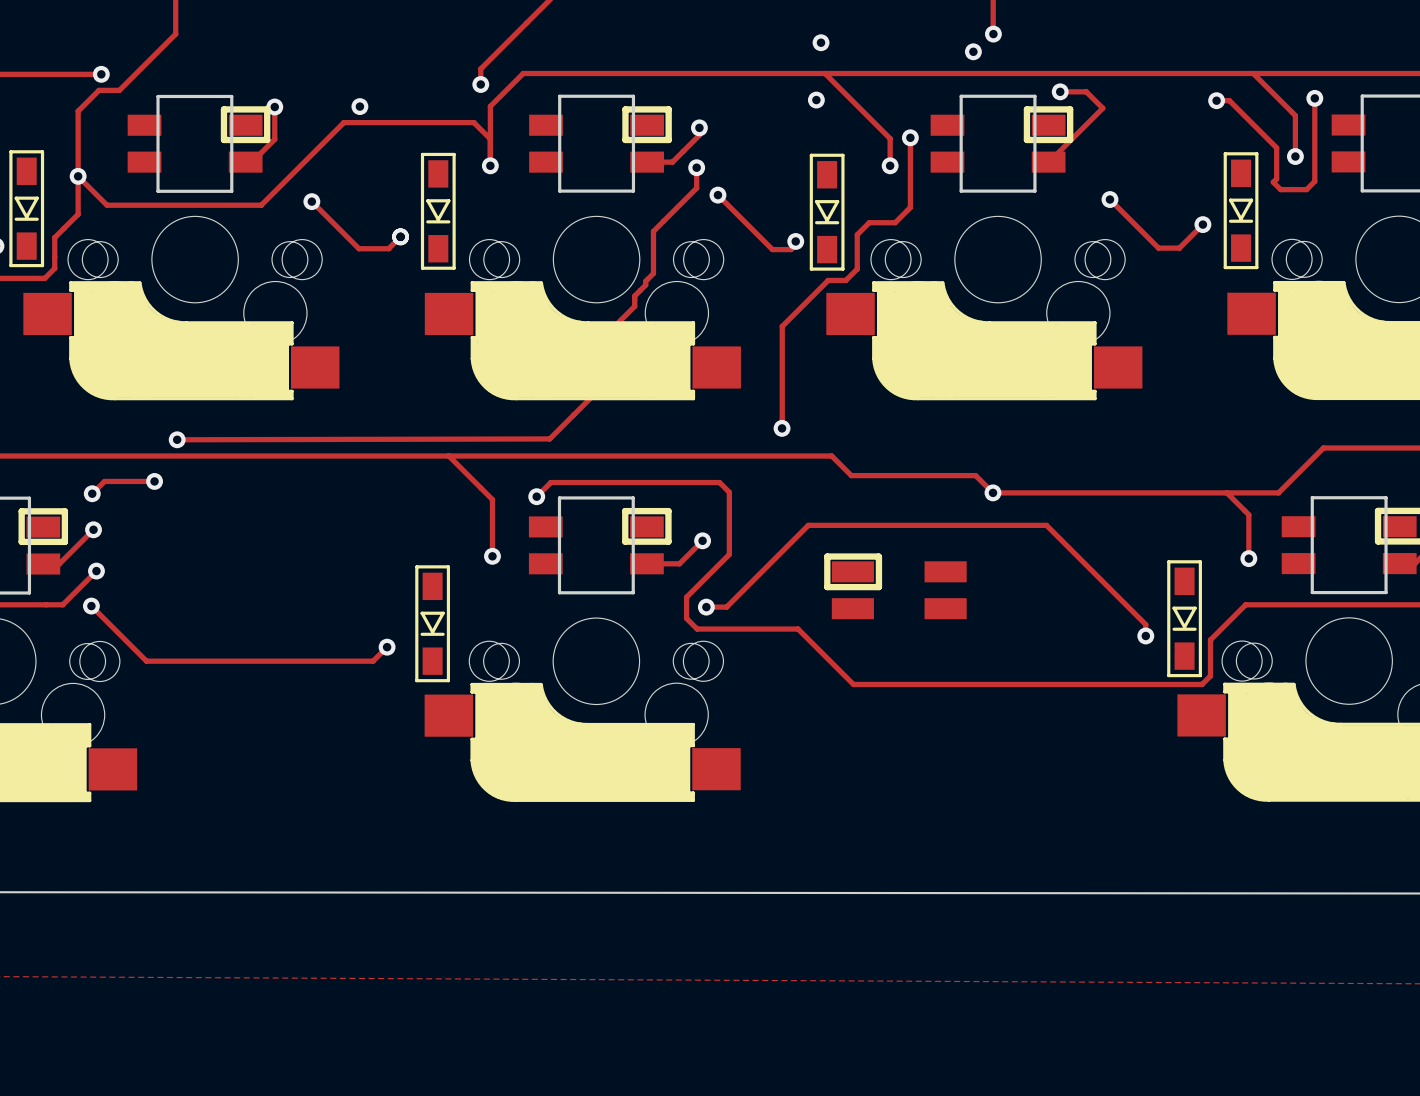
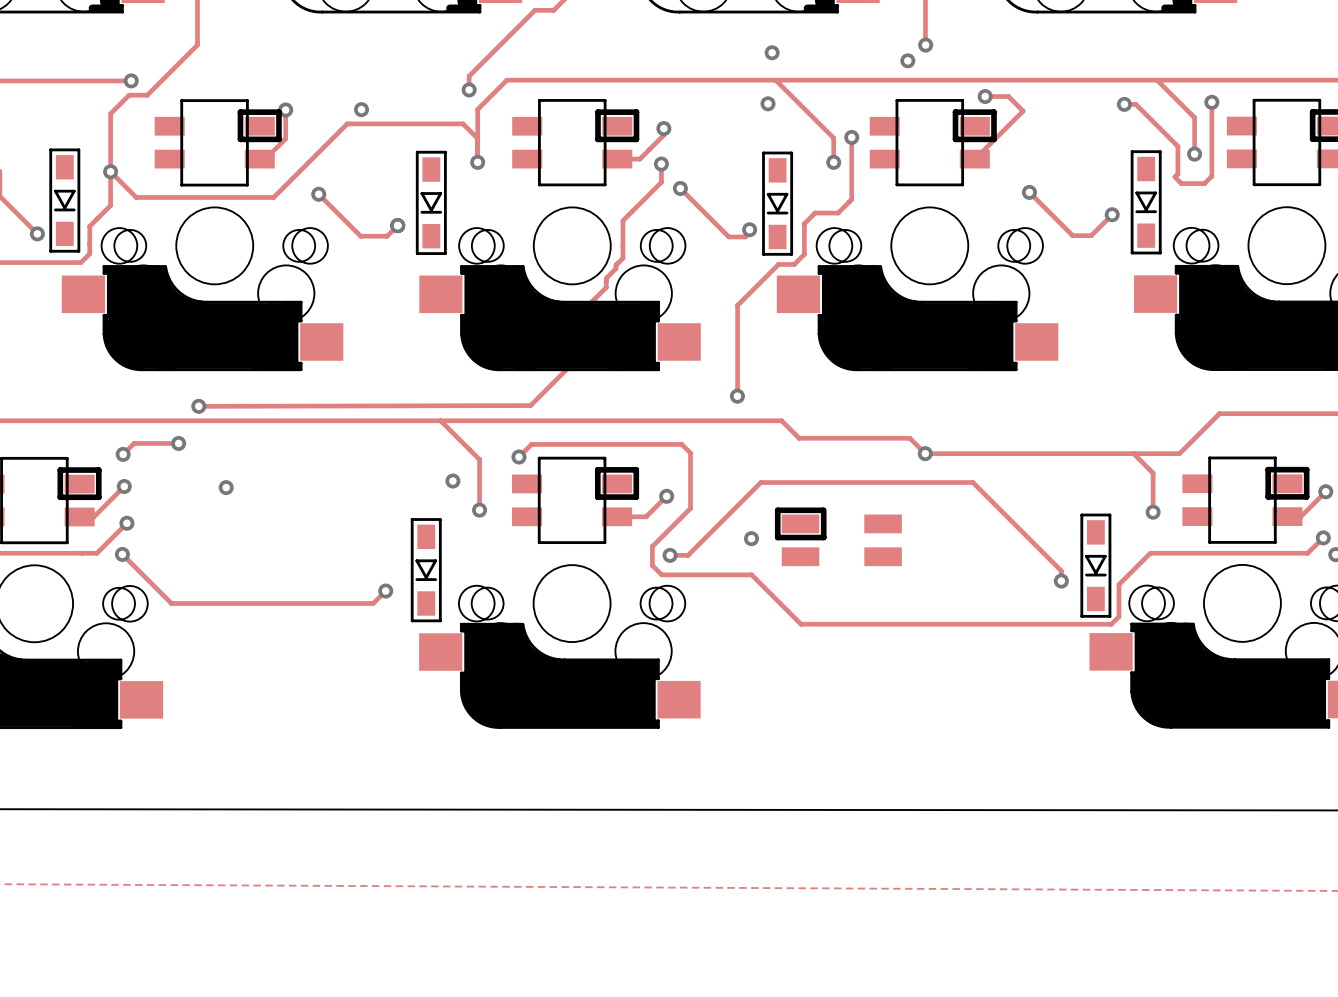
via: none -> (452, 481)
via: none -> (226, 487)
via: none -> (751, 538)

